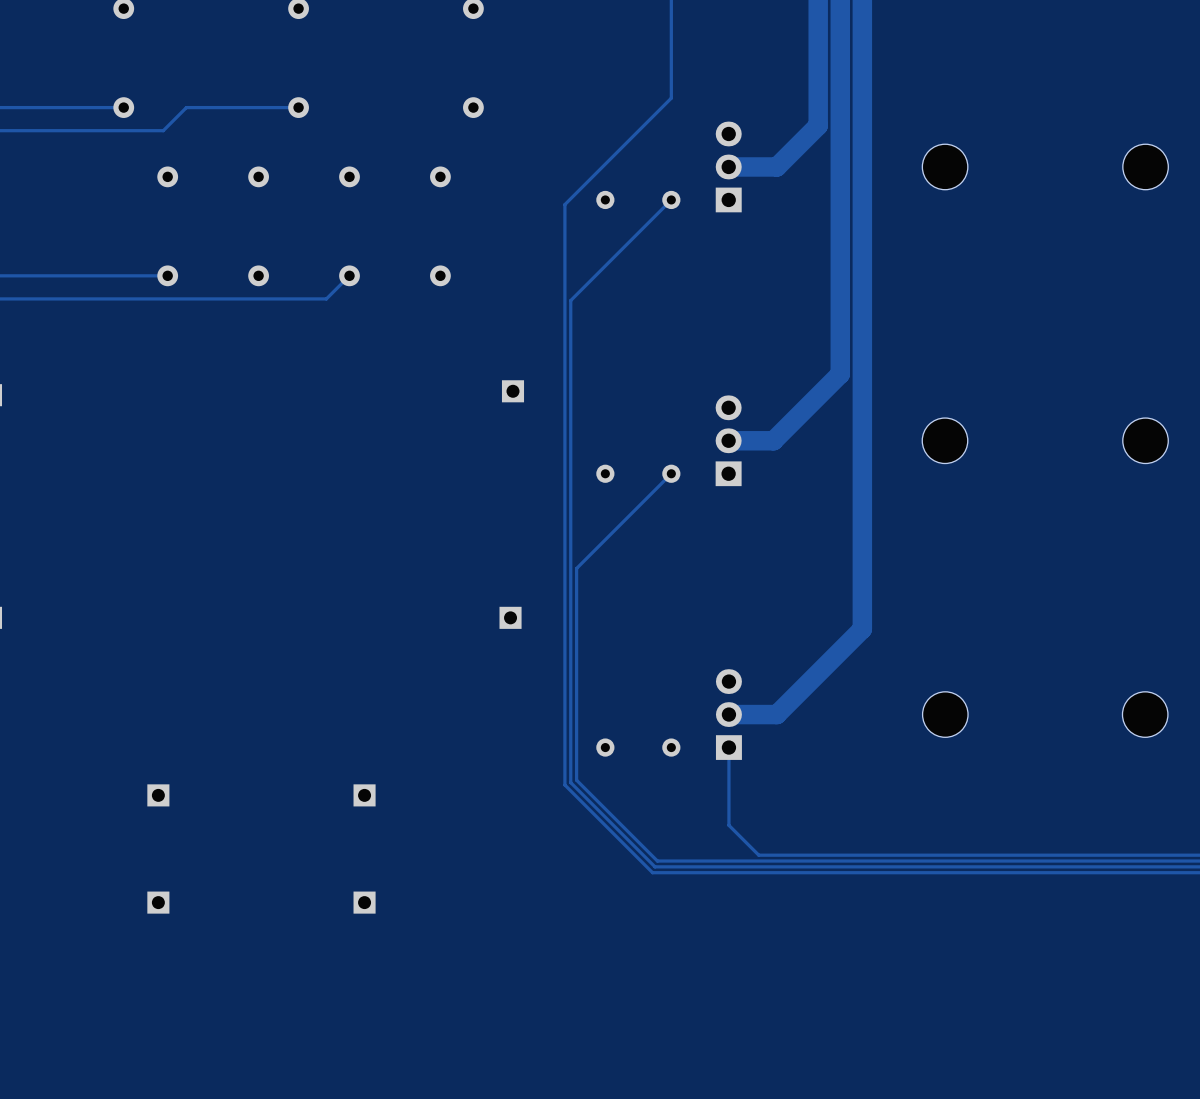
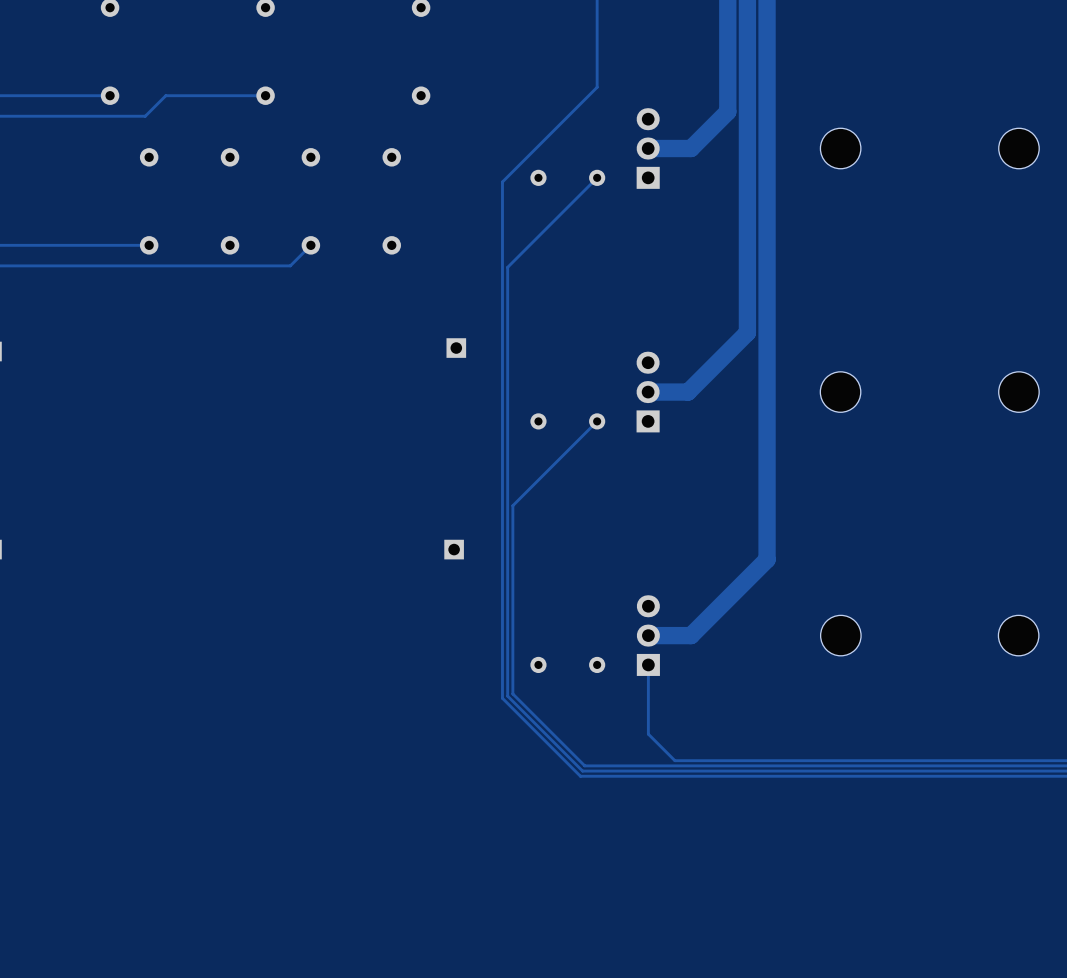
part: (158, 795) -> none
part: (364, 795) -> none
part: (158, 902) -> none
part: (364, 902) -> none

